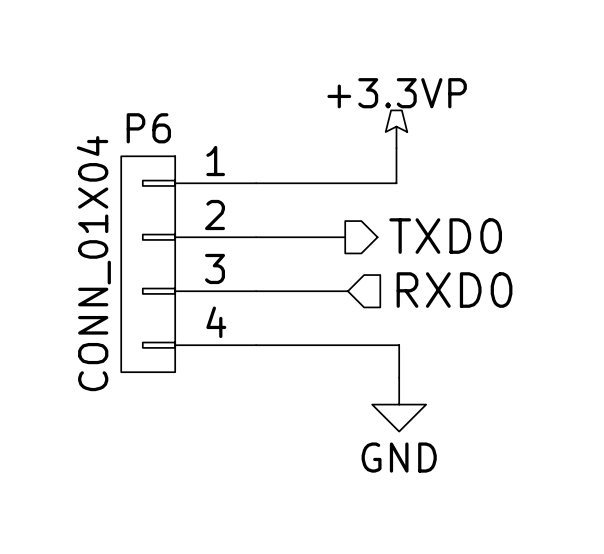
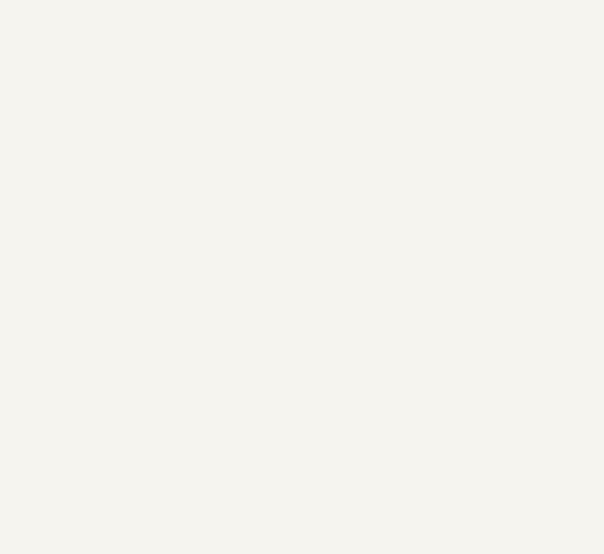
power symbol: +3.3VP (396, 129) -> none
wire: (396, 148) (396, 183) (256, 183) -> none
hierarchical label: TXD0 (445, 236) -> none
wire: (256, 237) (345, 237) -> none
P6: CONN_01X04 (188, 264) -> none
hierarchical label: RXD0 (454, 290) -> none
wire: (256, 291) (347, 291) -> none
wire: (256, 345) (399, 345) (399, 377) -> none
power symbol: GND (399, 404) -> none

